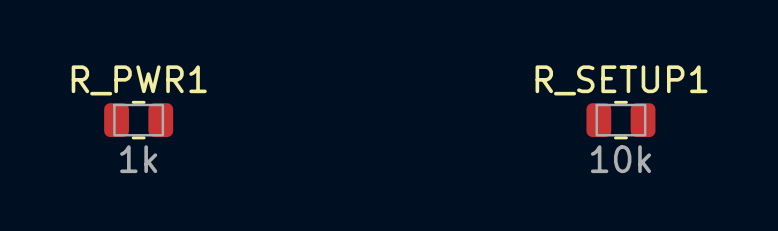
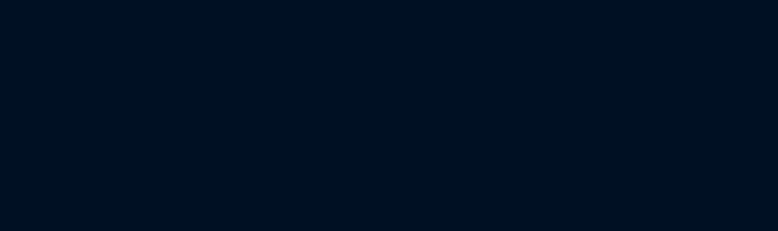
R_PWR1: 1k (138, 120) -> none
R_SETUP1: 10k (620, 120) -> none

